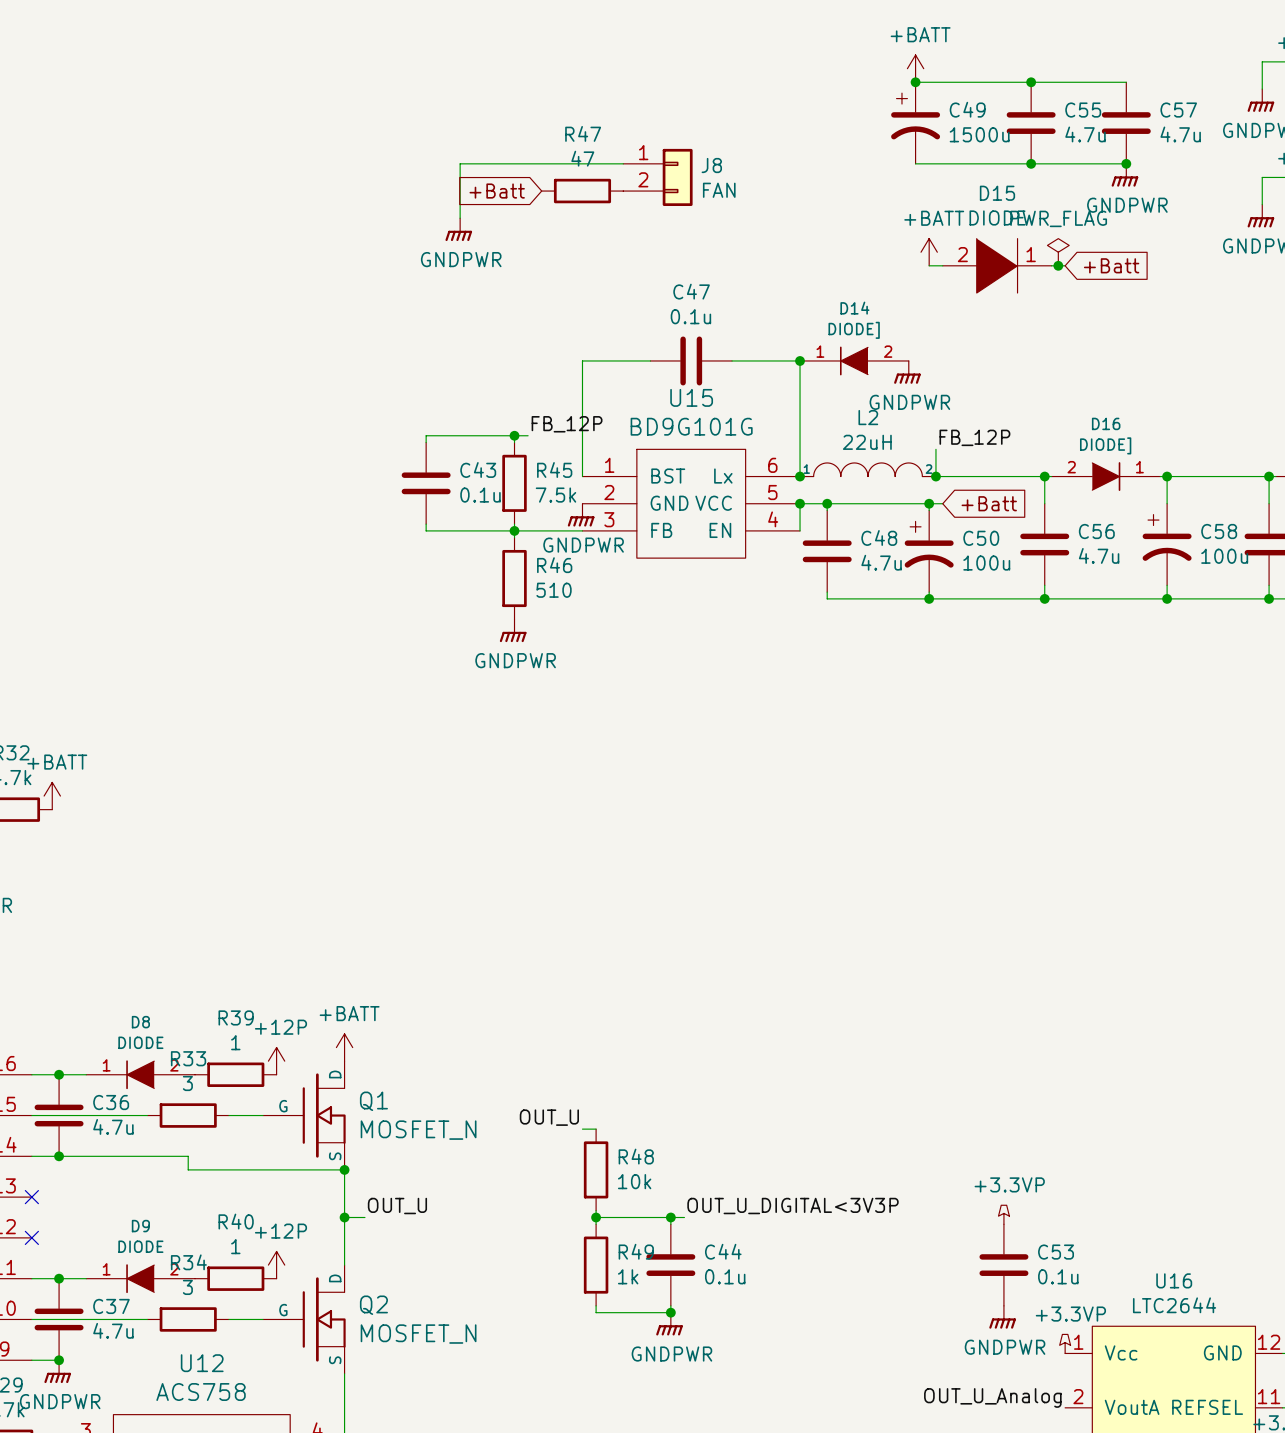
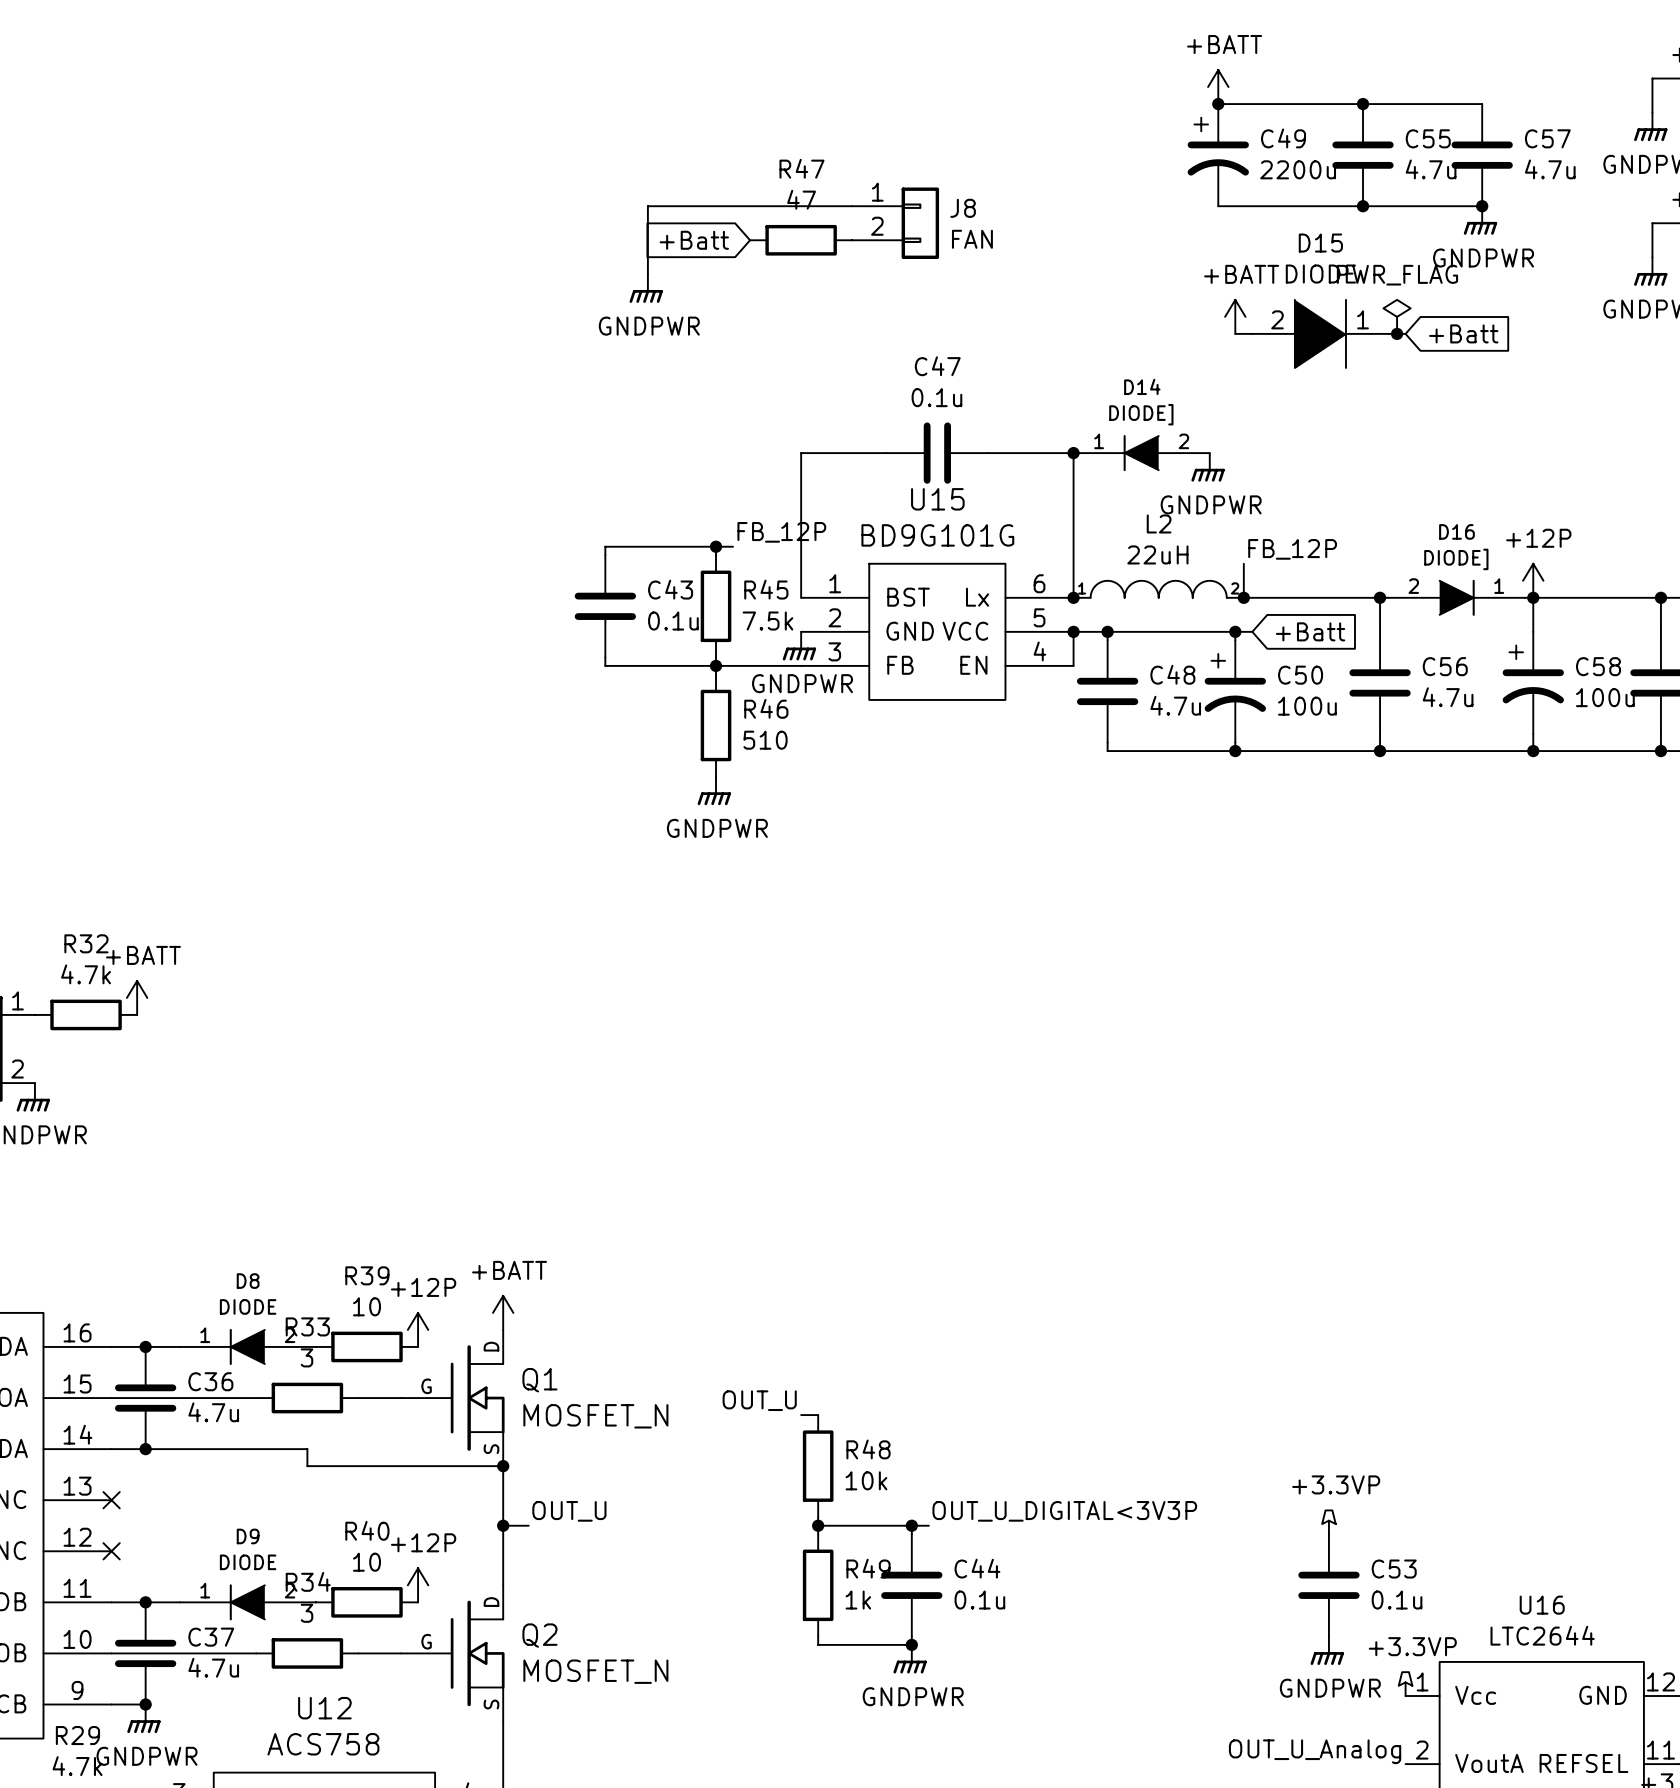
C49 value: 1500u (979, 134) -> 2200u (1298, 169)
power symbol: none -> +12P (1533, 580)
R39 value: 1 (235, 1042) -> 10 (366, 1306)
R40 value: 1 (235, 1246) -> 10 (366, 1562)

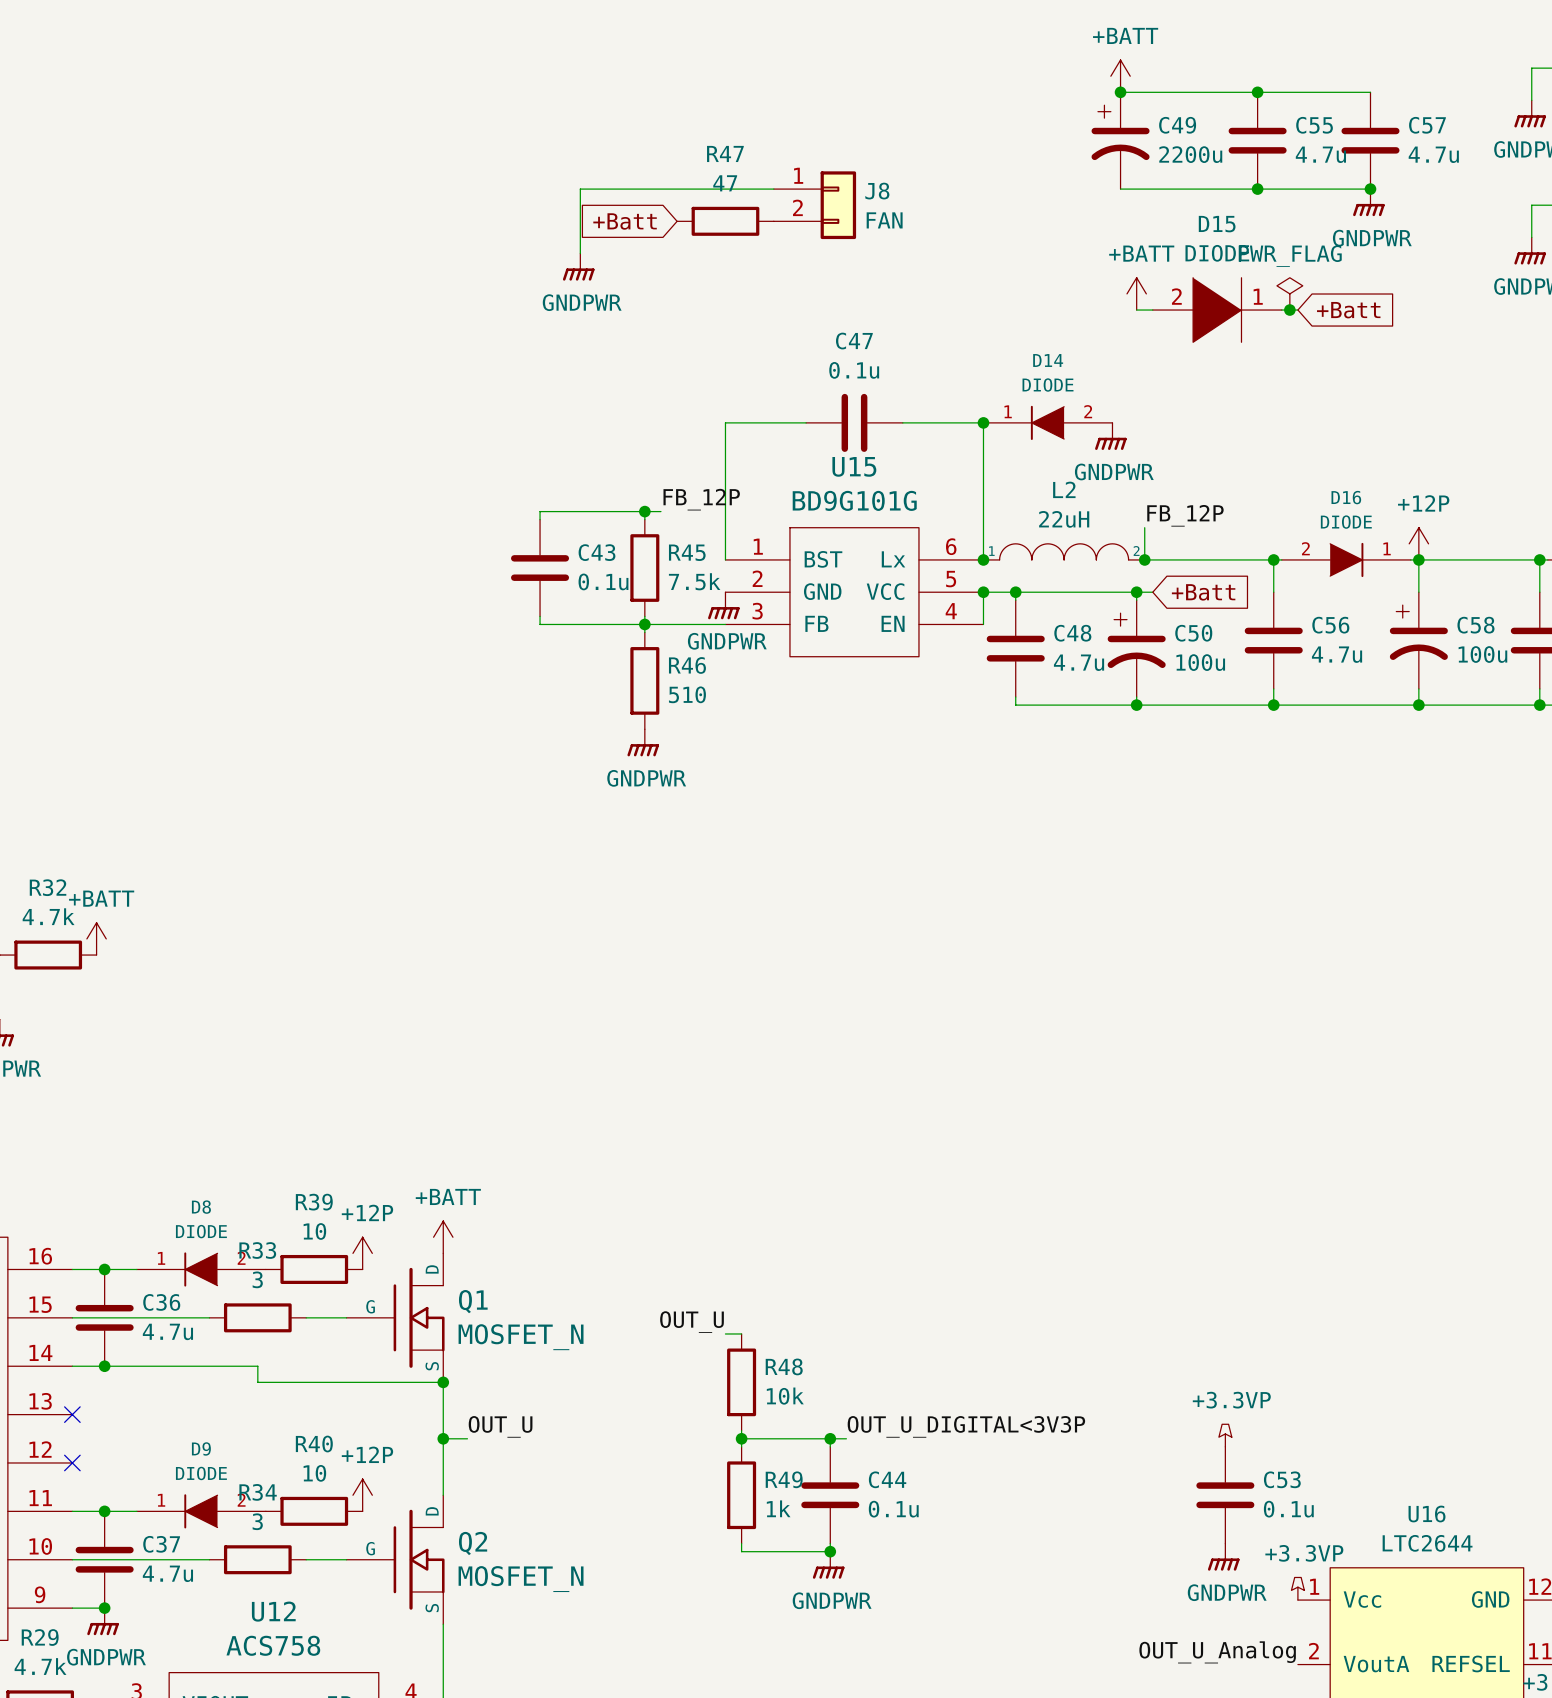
D14 value: DIODE] (1141, 414) -> DIODE (1048, 385)
D16 value: DIODE] (1456, 559) -> DIODE (1346, 522)

